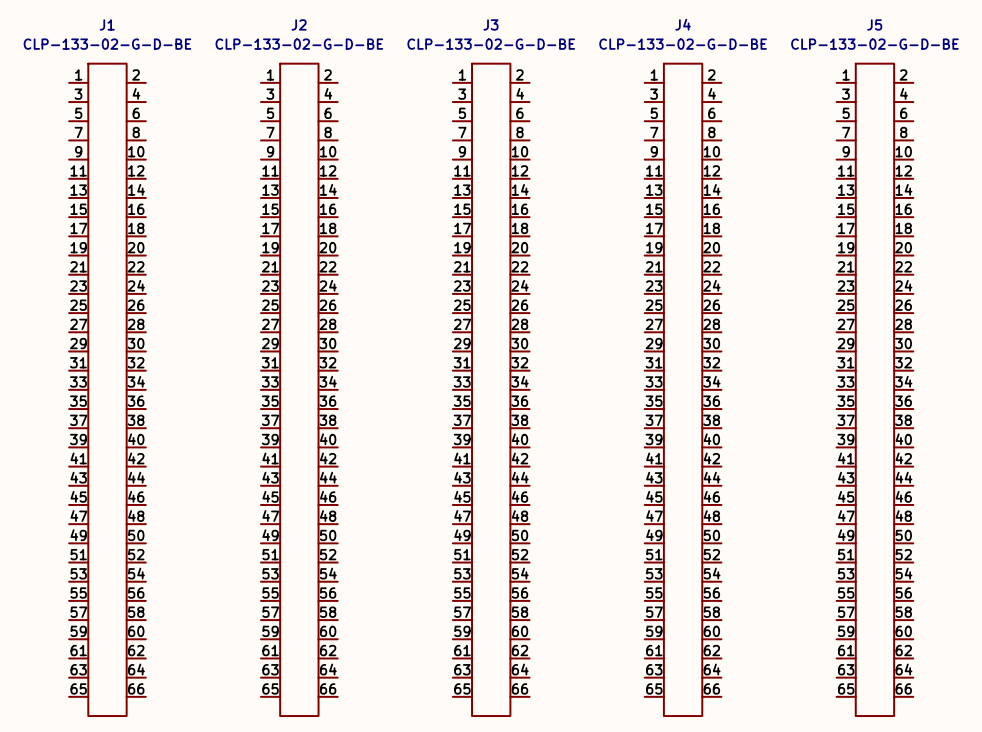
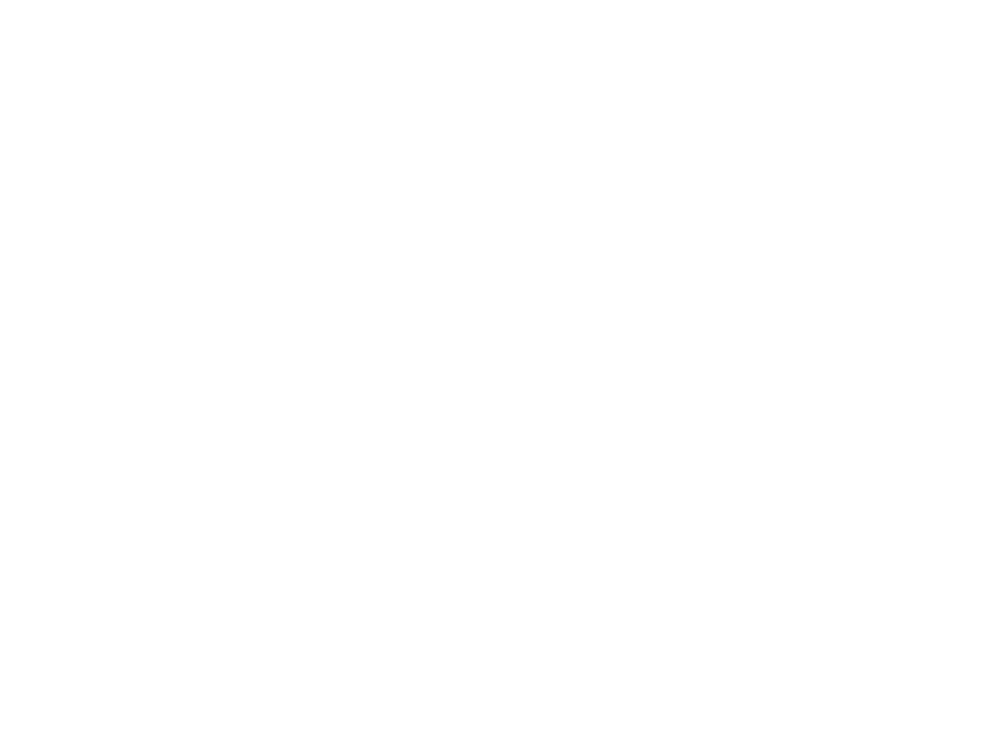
J1: CLP-133-02-G-D-BE (107, 389) -> none
J2: CLP-133-02-G-D-BE (299, 389) -> none
J3: CLP-133-02-G-D-BE (491, 389) -> none
J4: CLP-133-02-G-D-BE (683, 389) -> none
J5: CLP-133-02-G-D-BE (874, 389) -> none

